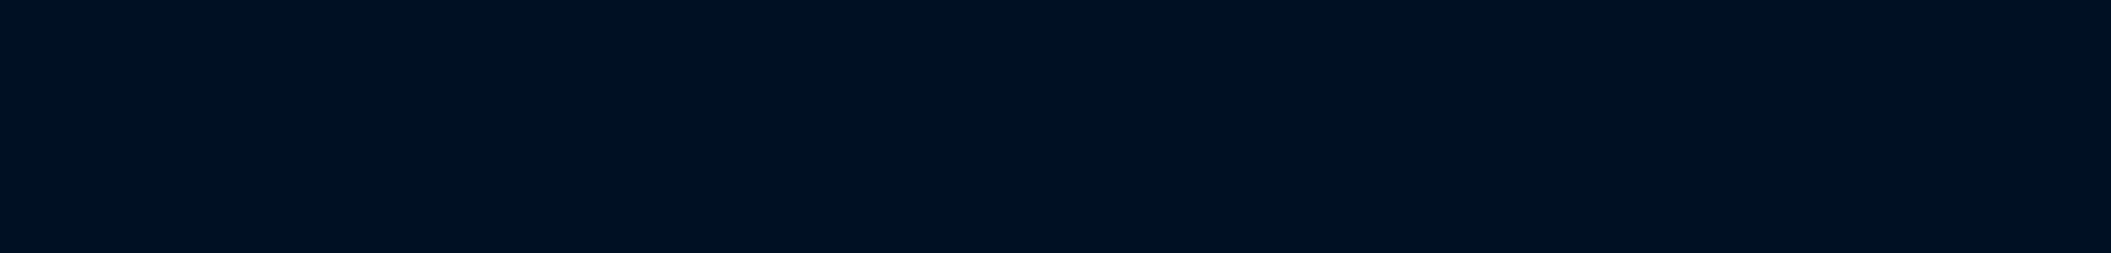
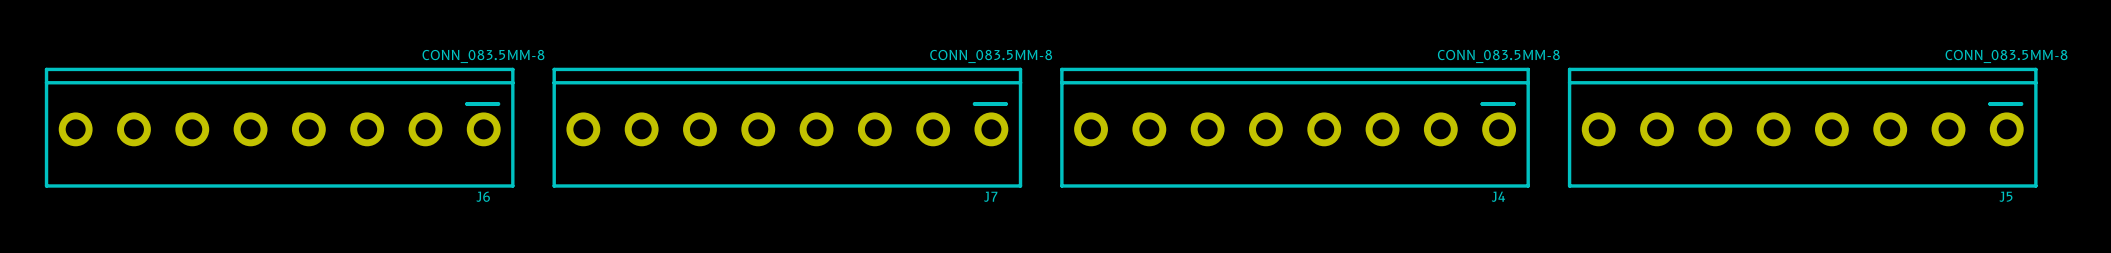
J6: none -> CONN_083.5MM-8 (279, 127)
J7: none -> CONN_083.5MM-8 (787, 127)
J4: none -> CONN_083.5MM-8 (1295, 127)
J5: none -> CONN_083.5MM-8 (1802, 127)

